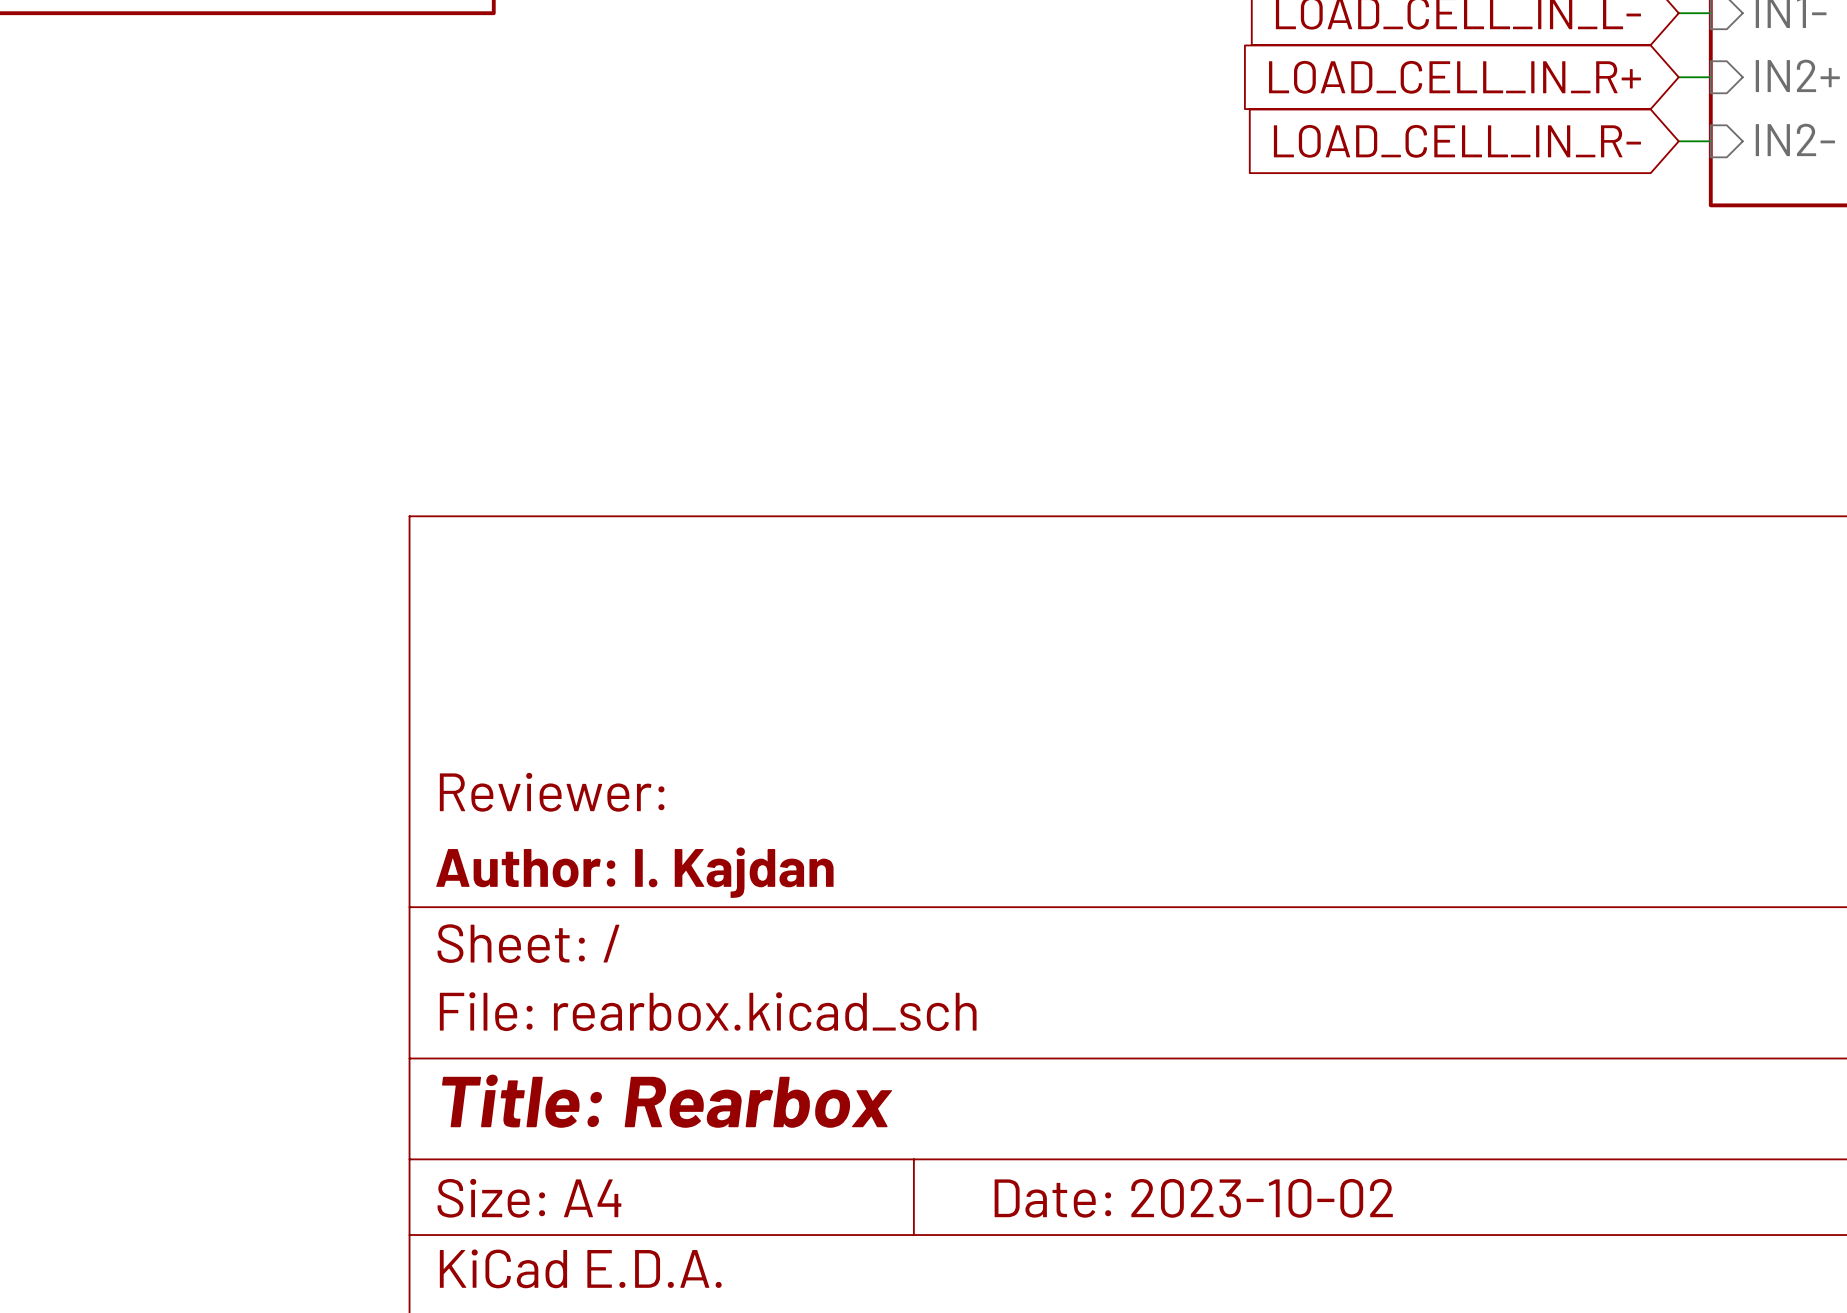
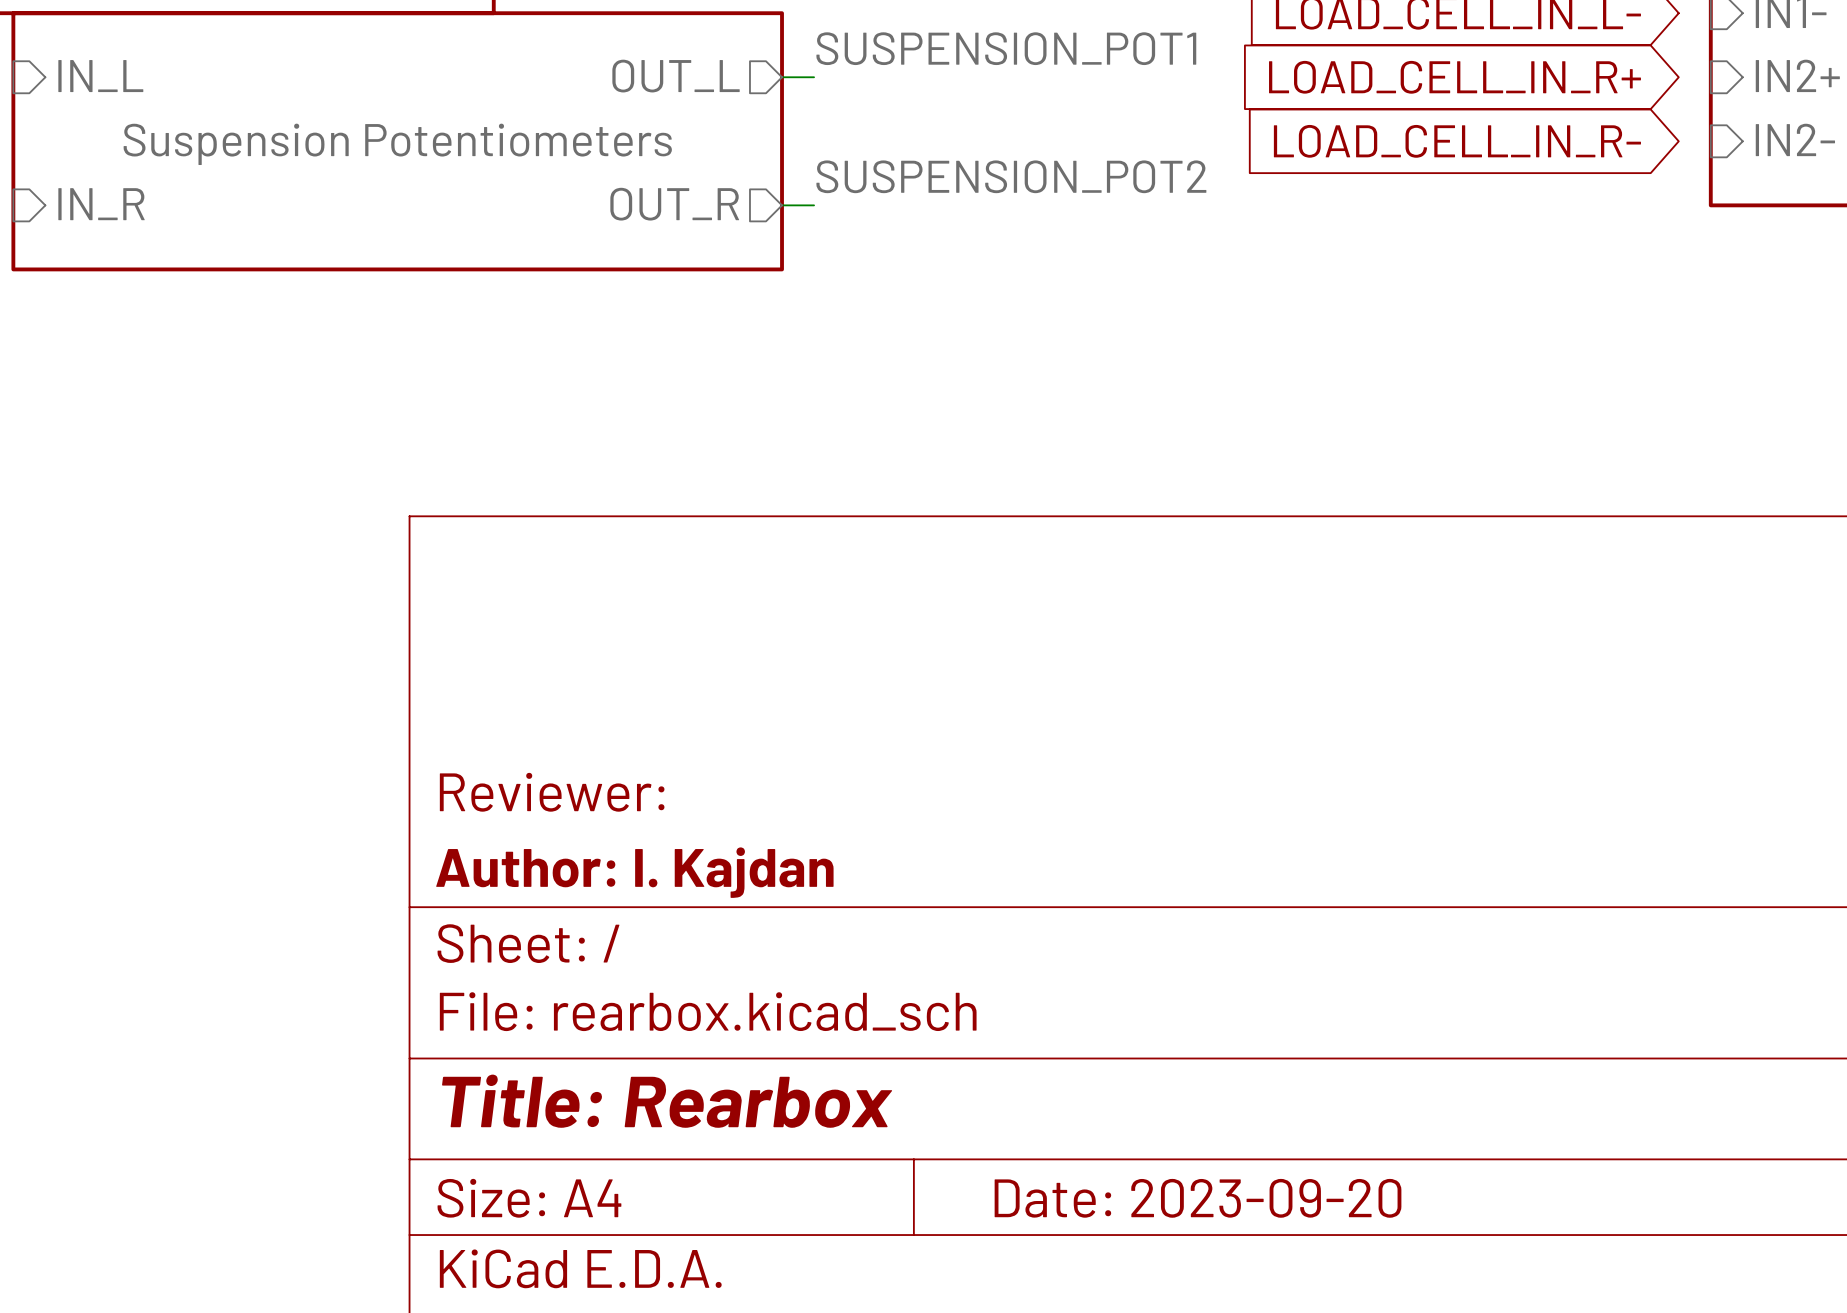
wire: (1678, 13) (1710, 13) -> none
label: none -> SUSPENSION_POT1 (1006, 48)
sheet pin: none -> IN_L (100, 76)
sheet pin: none -> OUT_L (676, 76)
wire: none -> (782, 77) (814, 77)
wire: (1678, 77) (1710, 77) -> none
sheet Suspension Potentiometers: none -> (397, 141)
wire: (1678, 141) (1710, 141) -> none
label: none -> SUSPENSION_POT2 (1011, 176)
sheet pin: none -> IN_R (101, 204)
sheet pin: none -> OUT_R (674, 204)
wire: none -> (782, 205) (814, 205)
title block: Date: 2023-10-02 (1193, 1198) -> Date: 2023-09-20 (1198, 1198)

